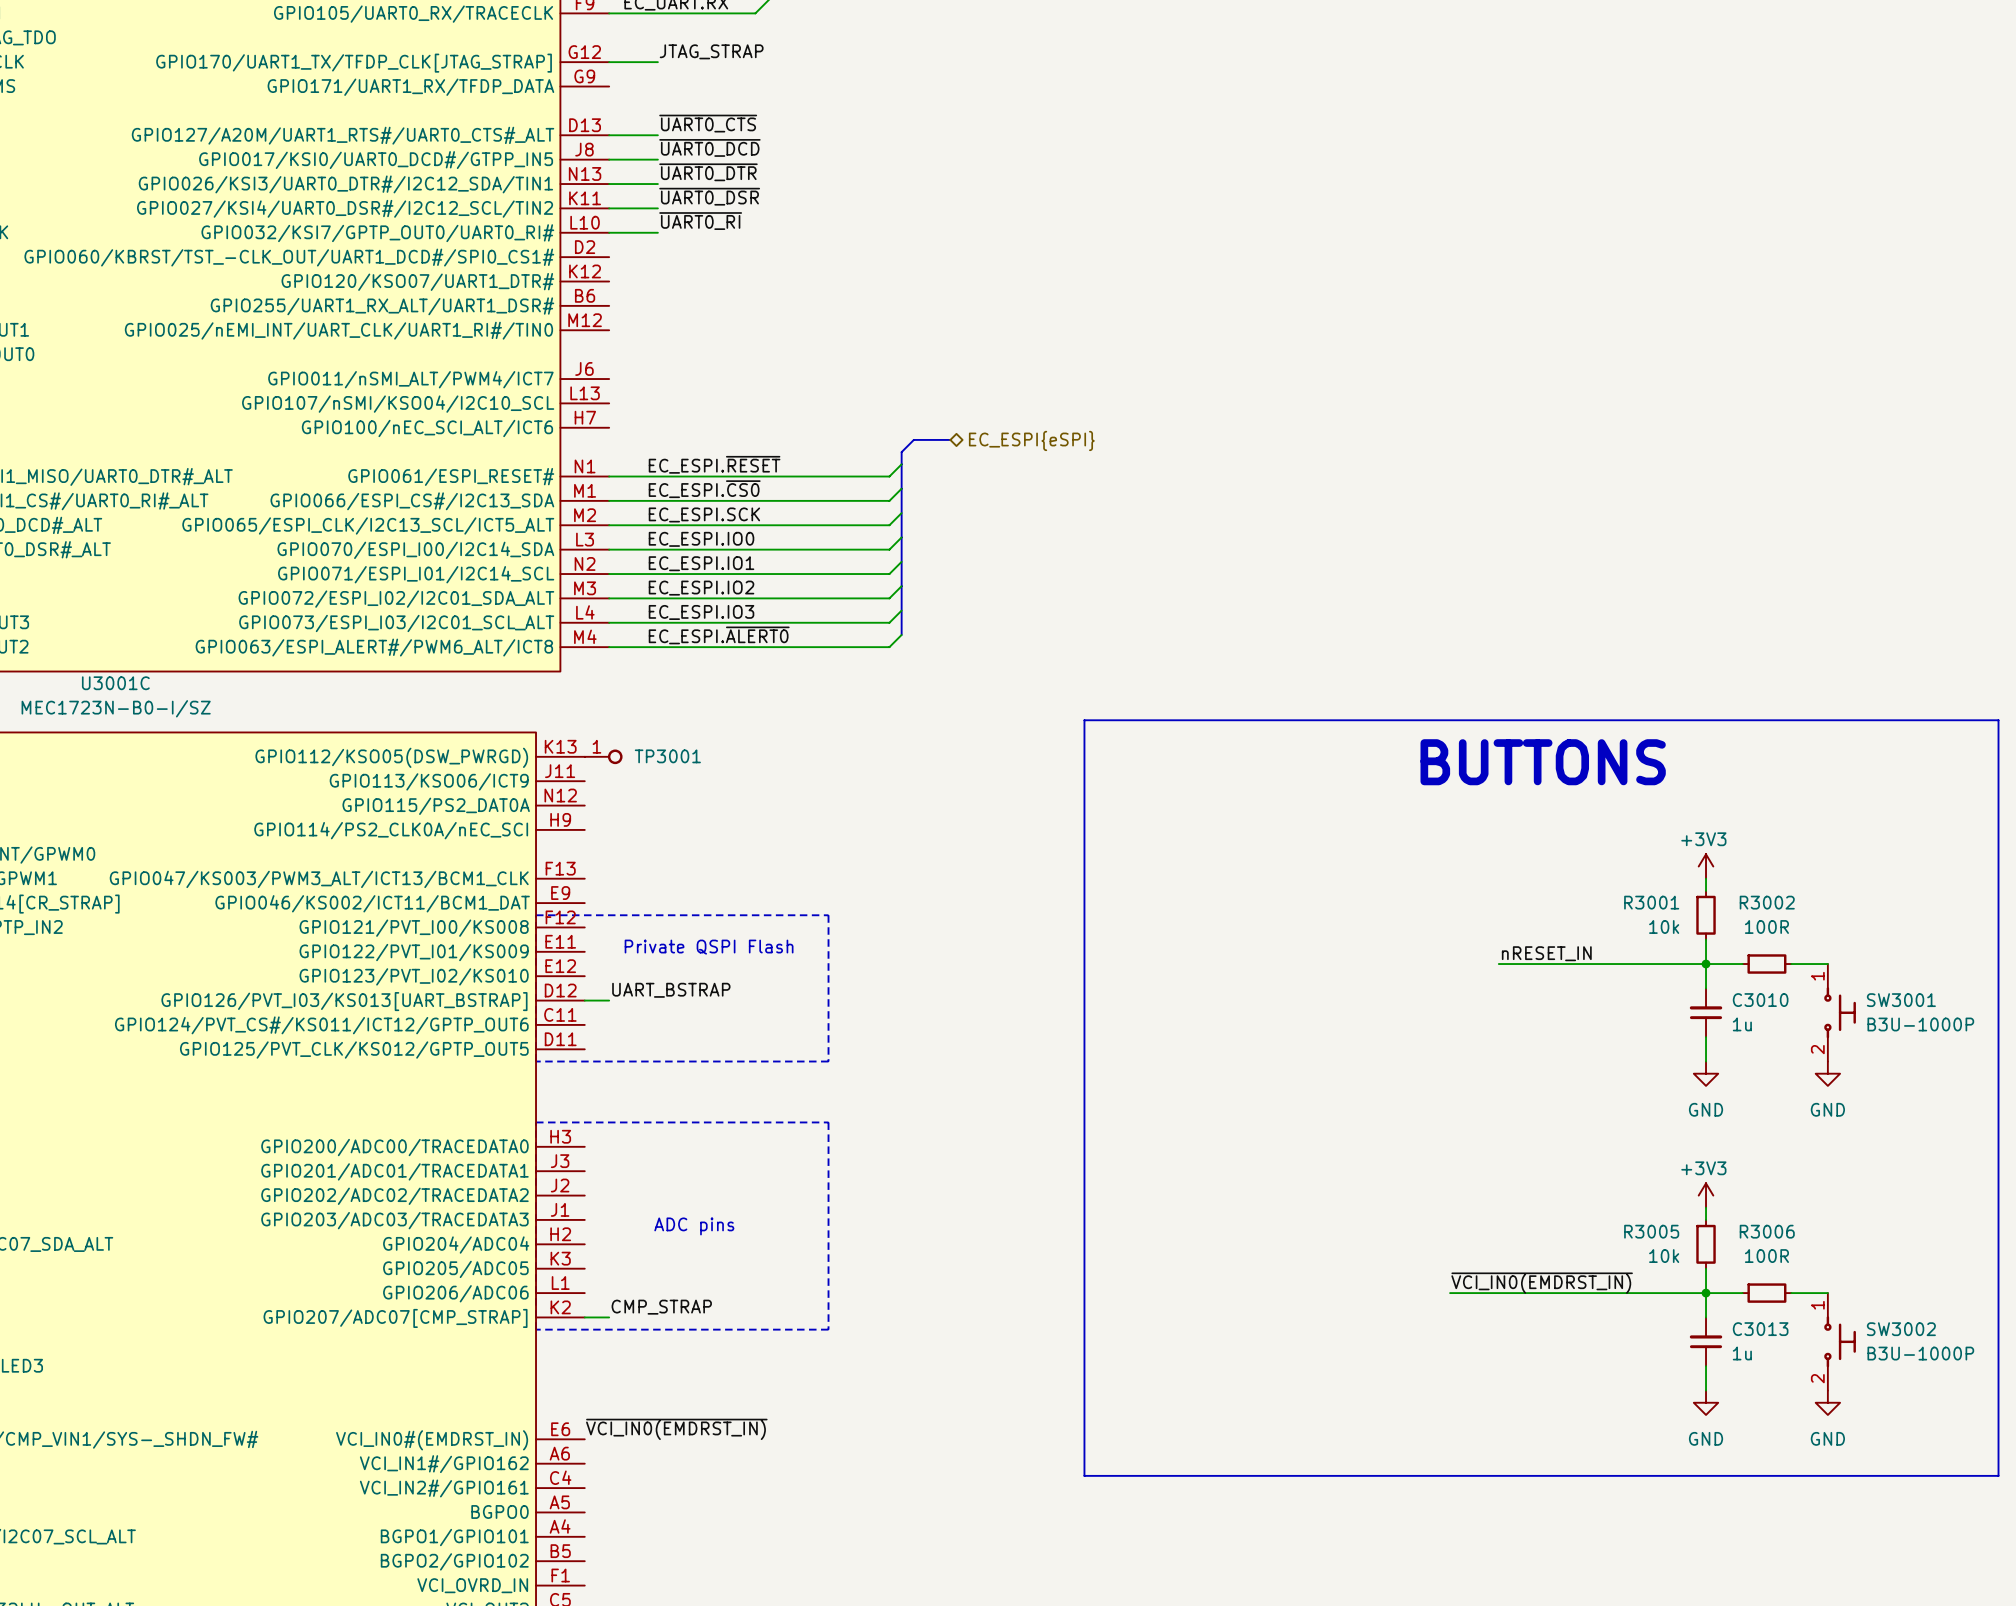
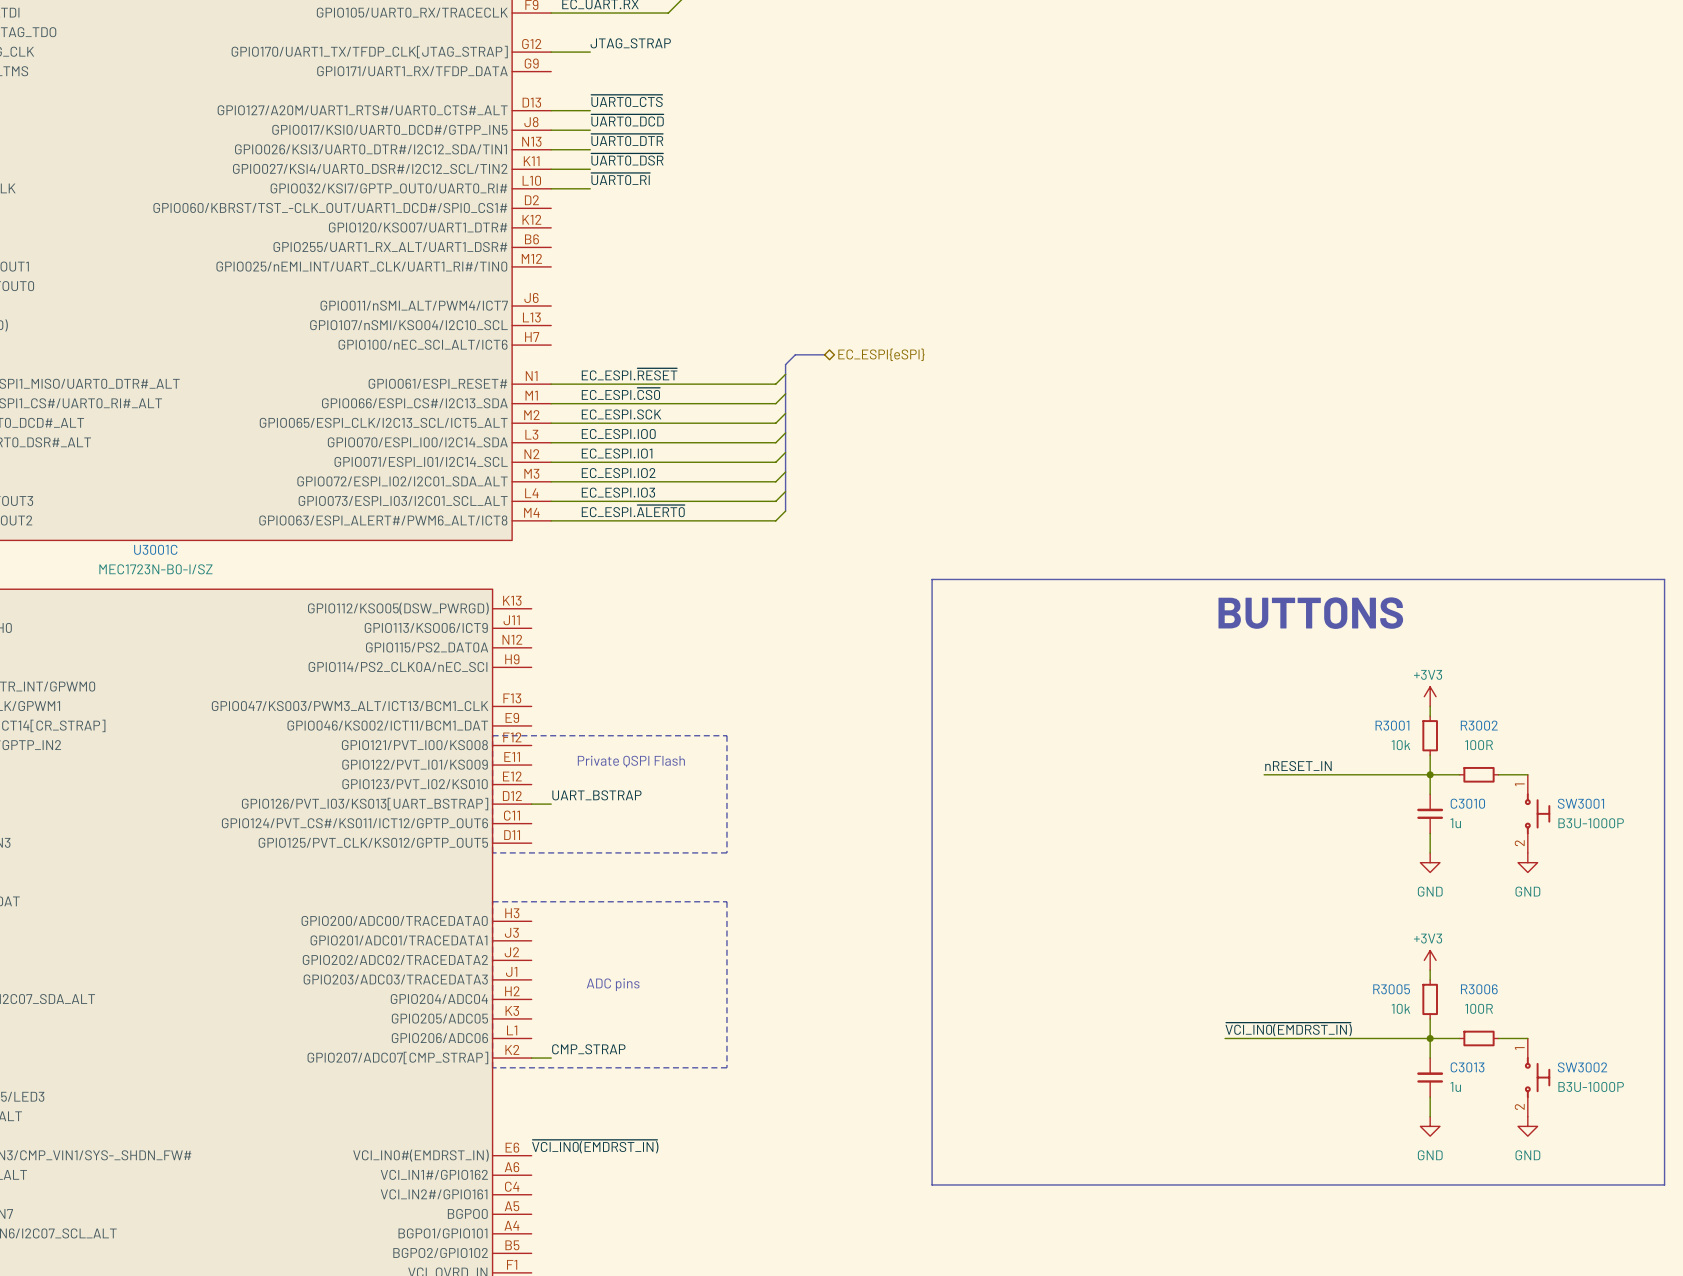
TP3001: (603, 756) -> none

